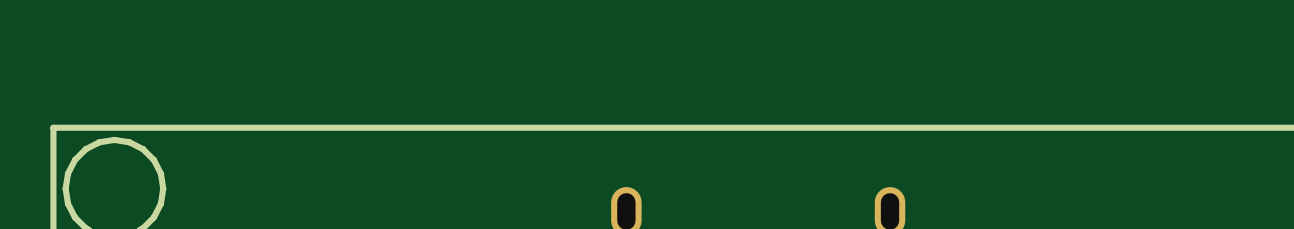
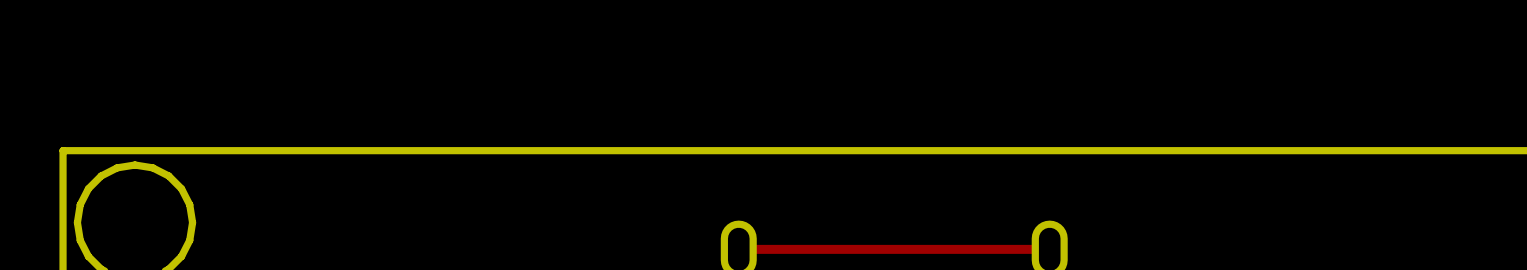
track: none -> (738, 249) (1049, 249)

